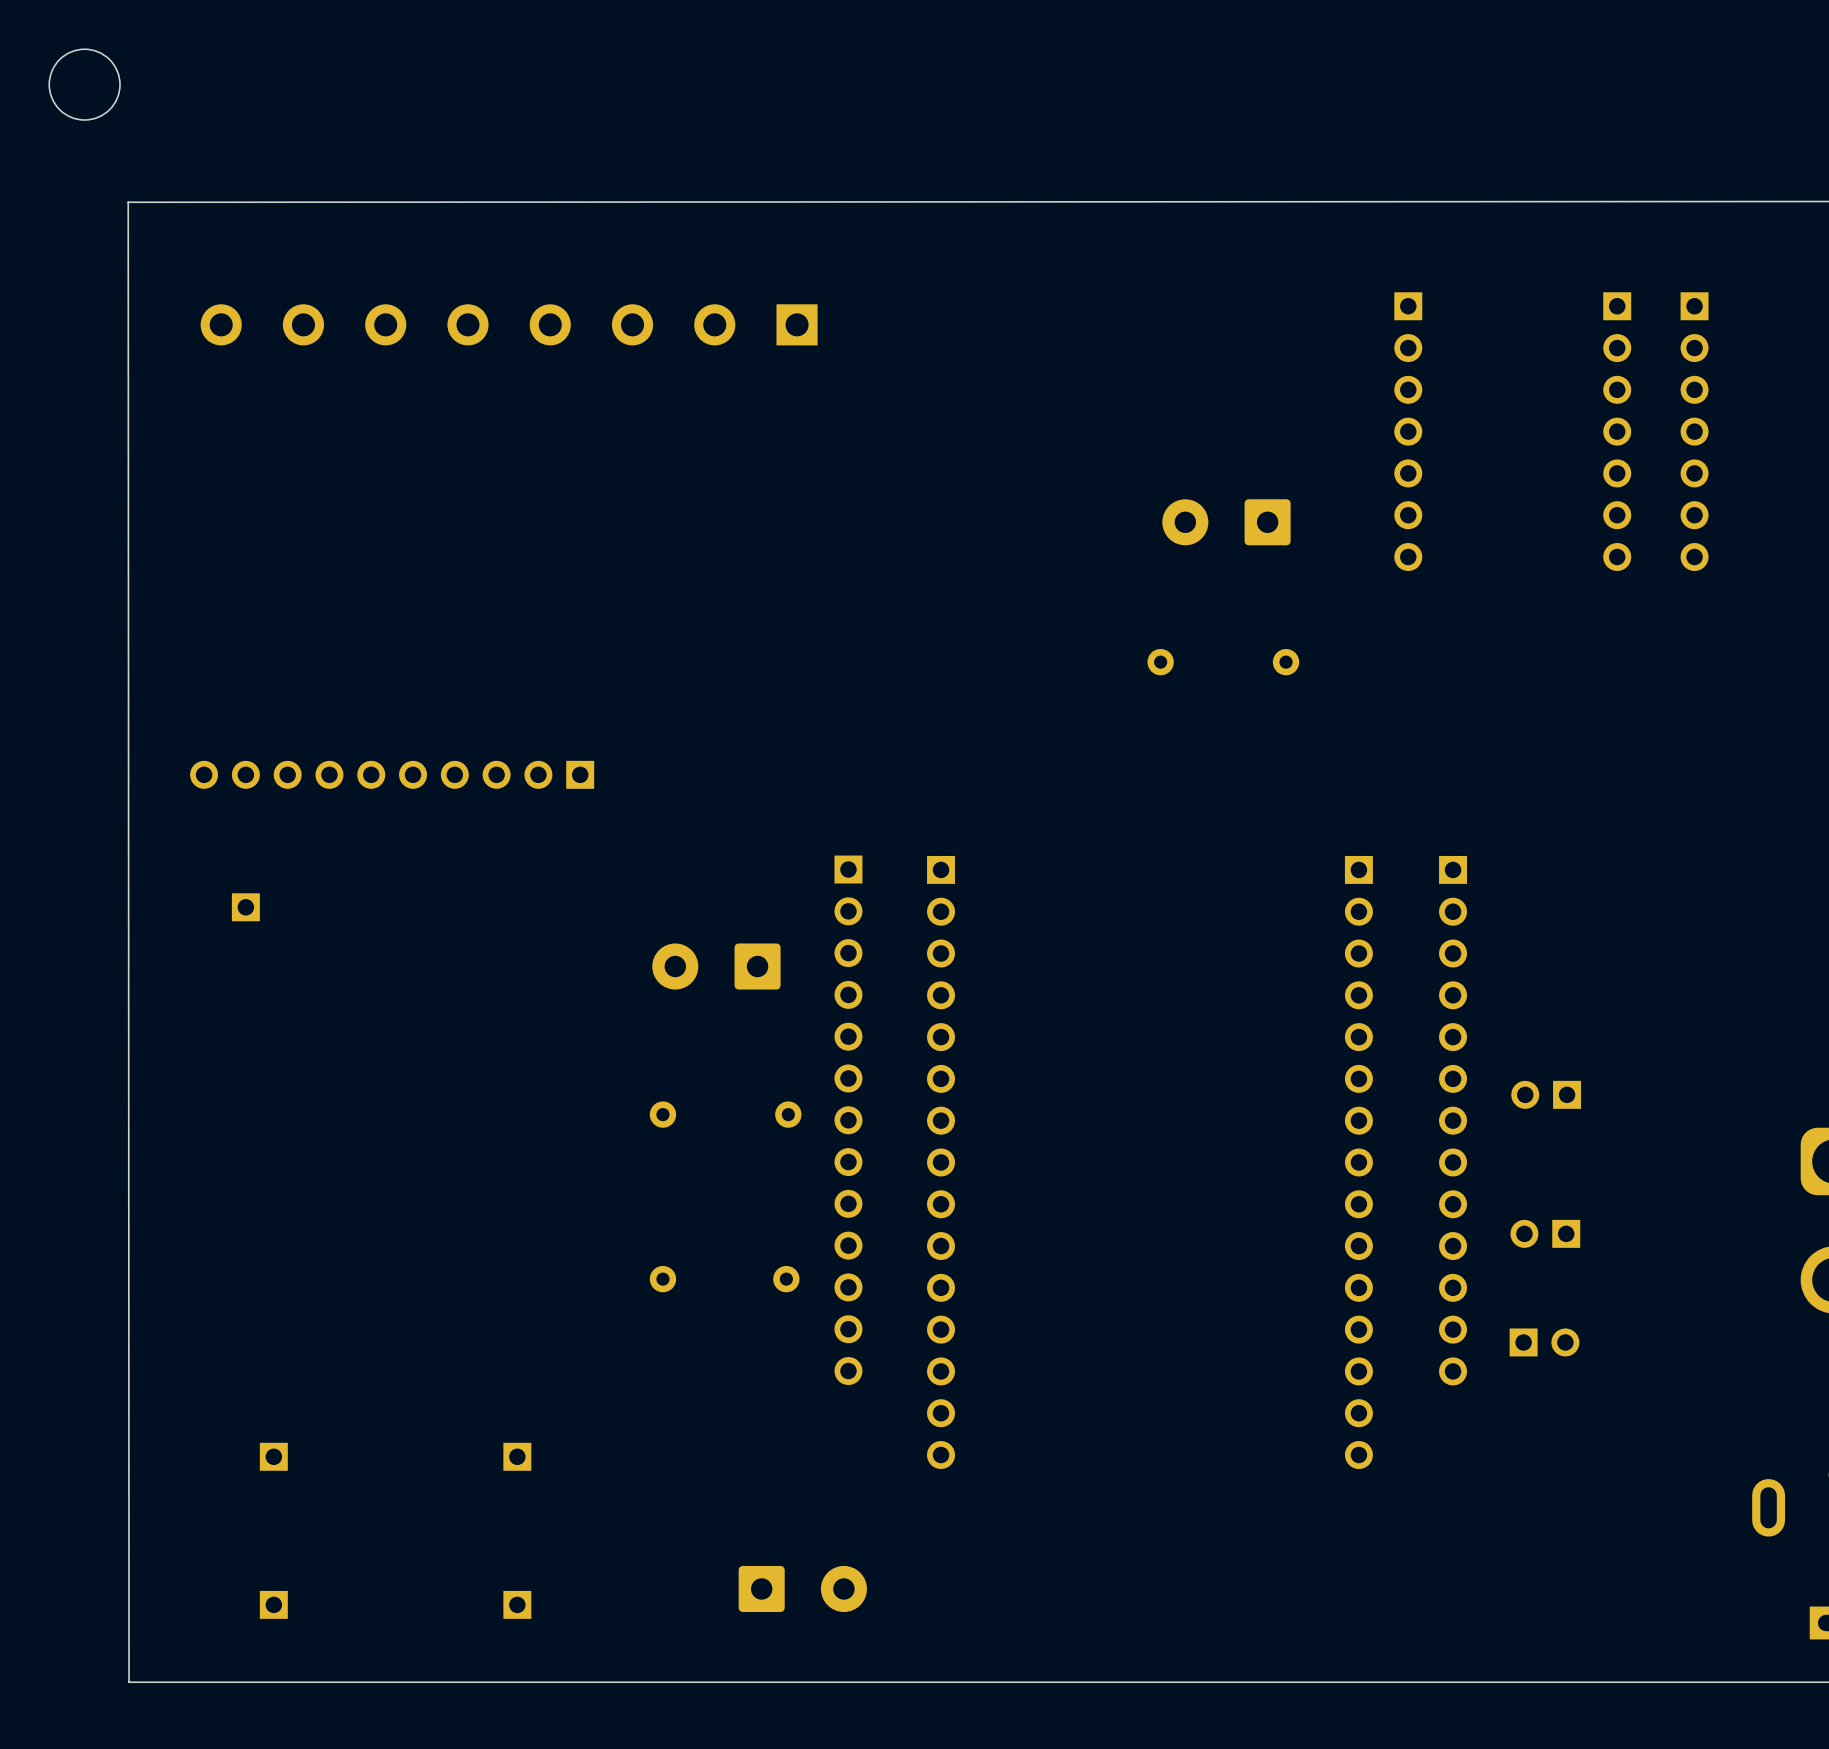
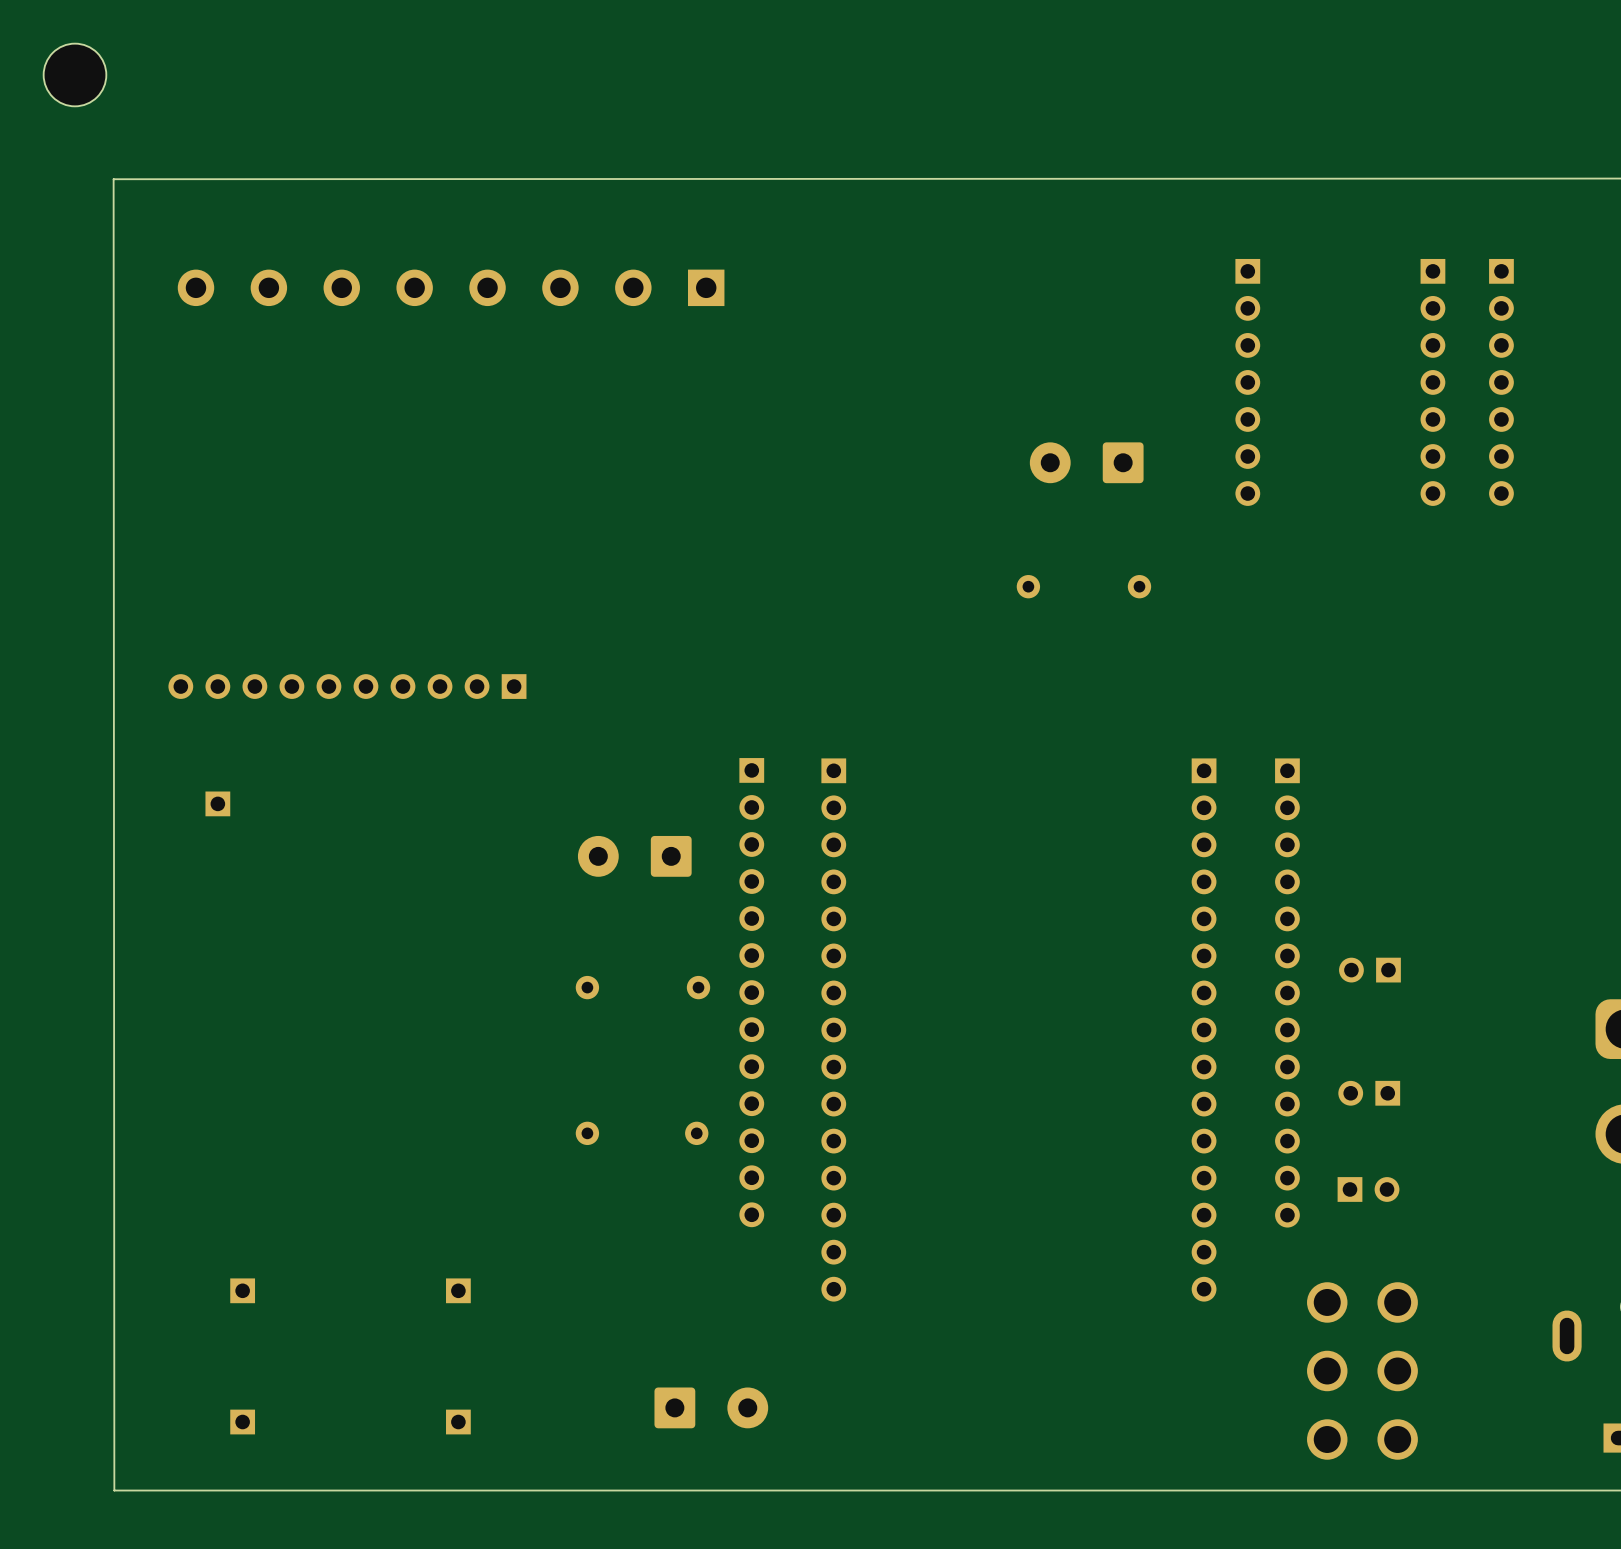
part: none -> (1362, 1370)

